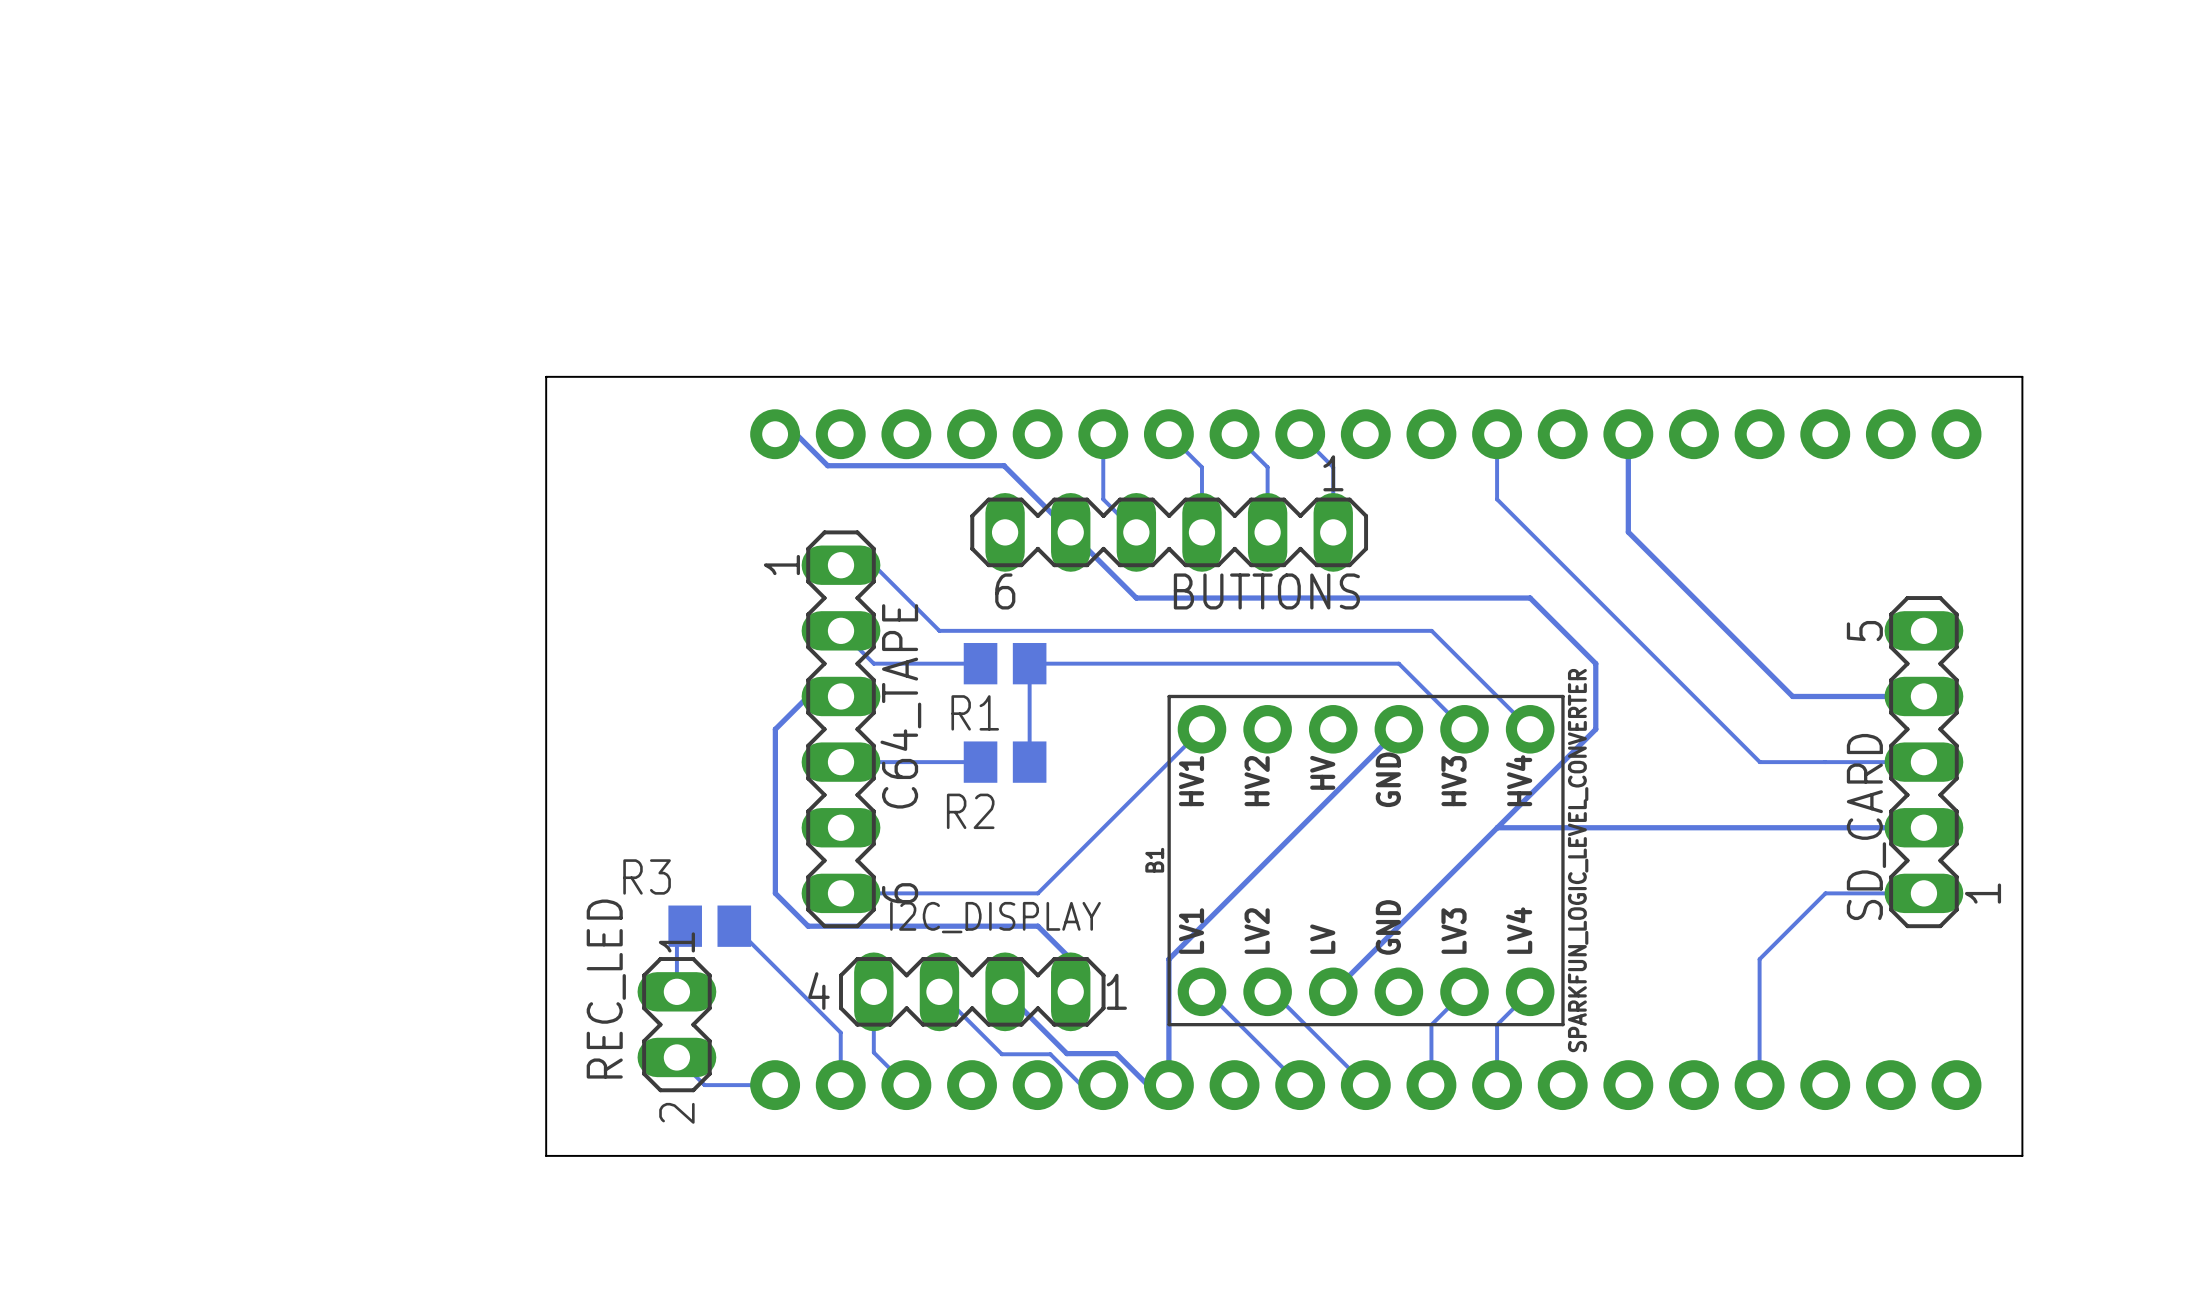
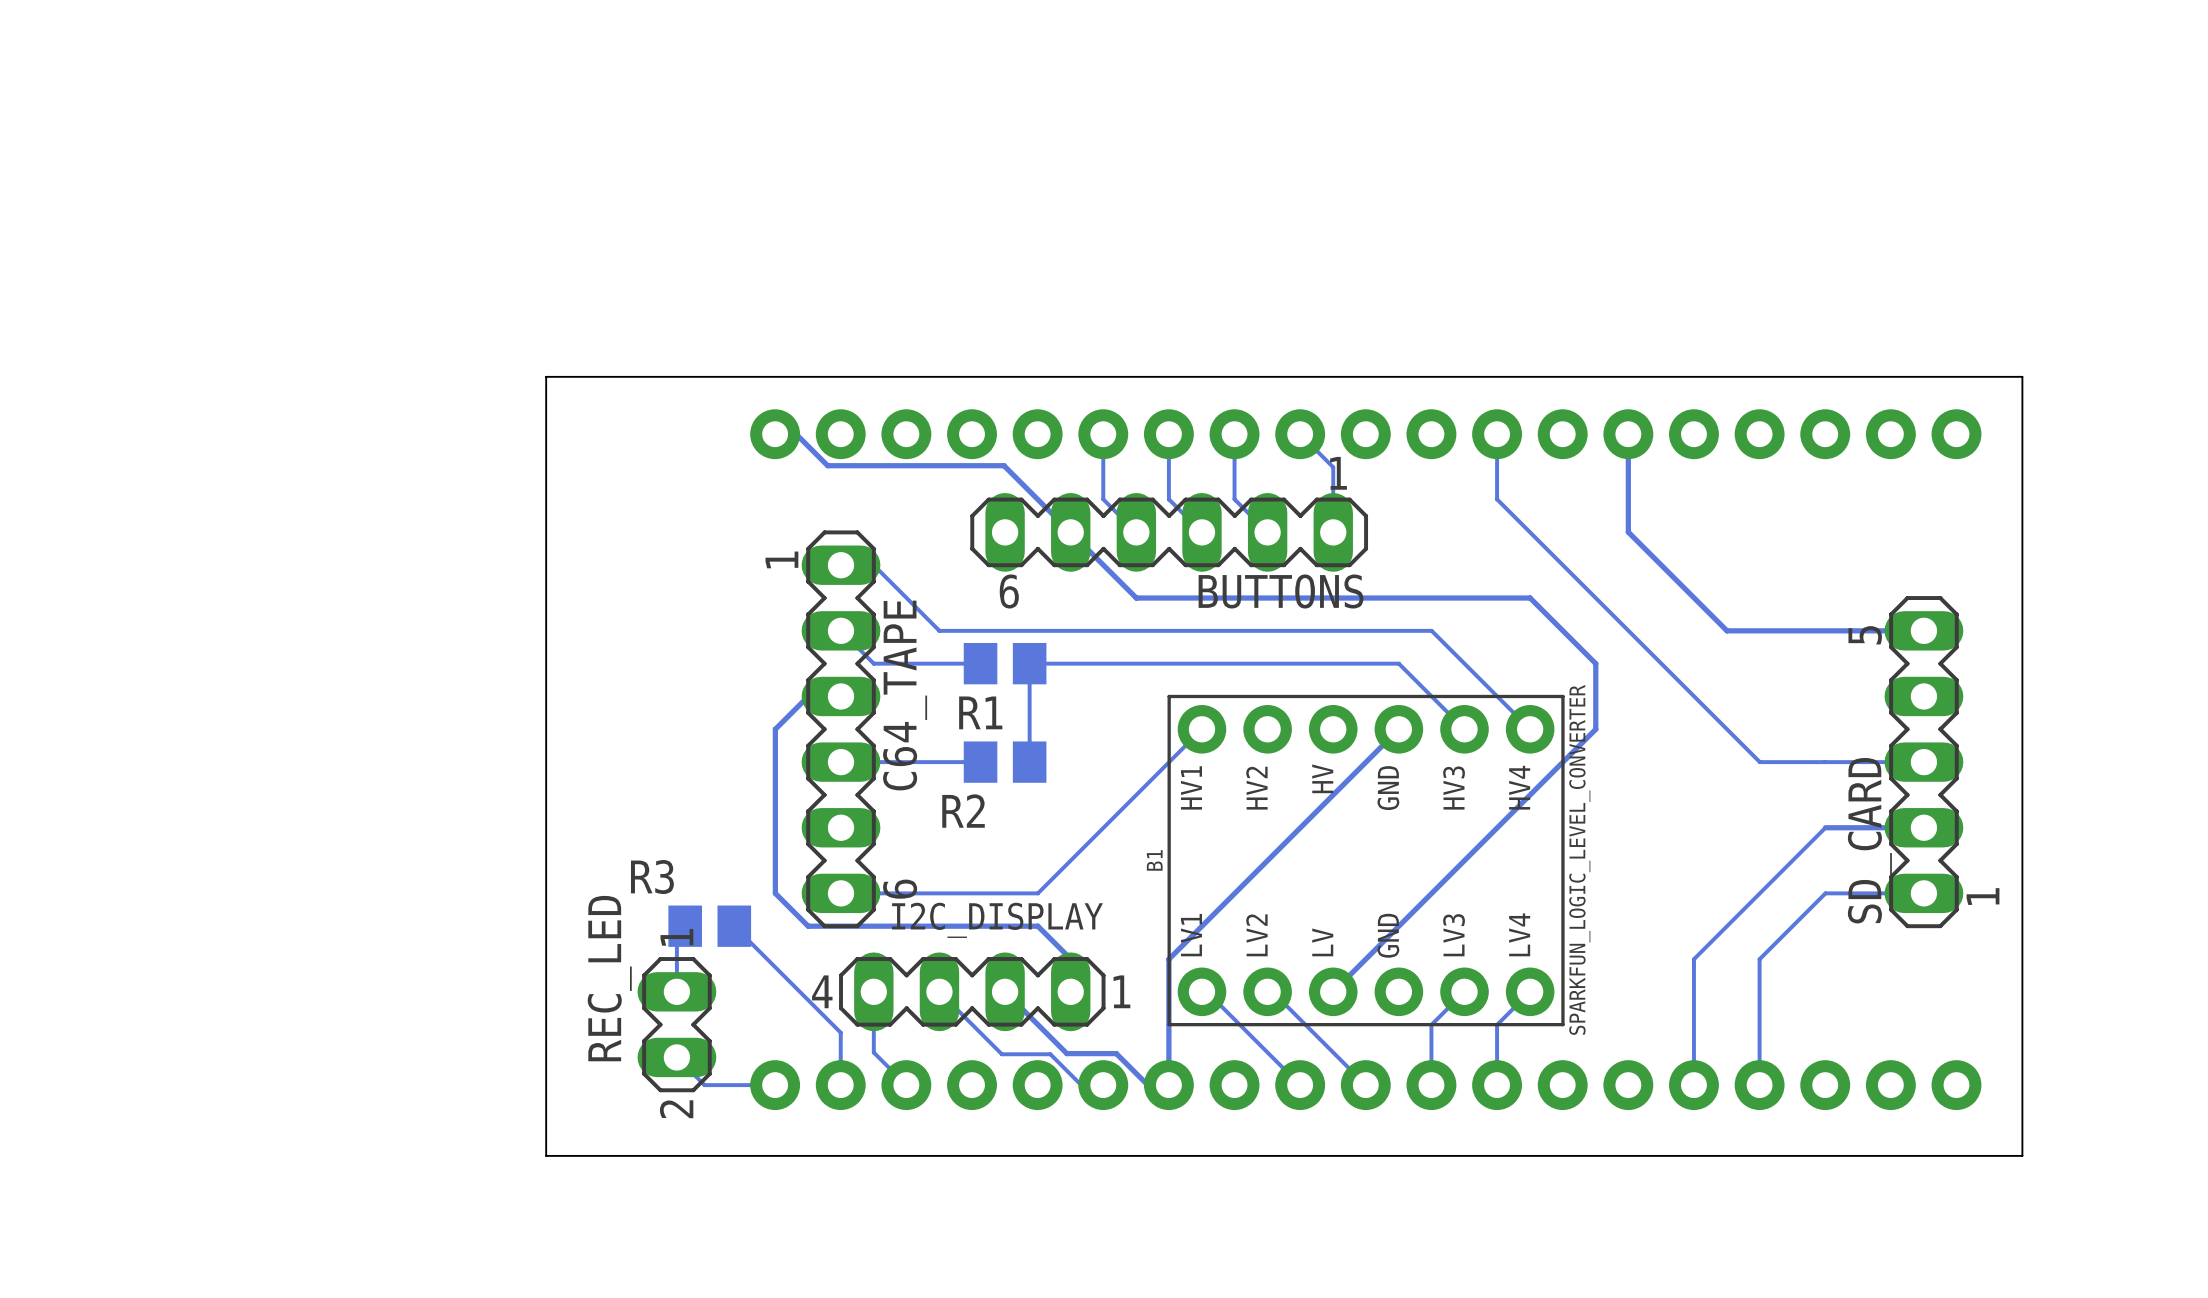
track: (1168, 434) (1201, 467) (1201, 532) -> (1168, 434) (1168, 499) (1201, 532)
track: (1234, 434) (1267, 467) (1267, 532) -> (1234, 434) (1234, 499) (1267, 532)
track: (1727, 630) (1792, 696) (1923, 696) -> (1727, 630) (1923, 630)
track: (1825, 827) (1497, 827) -> (1825, 827) (1693, 959) (1693, 1085)

